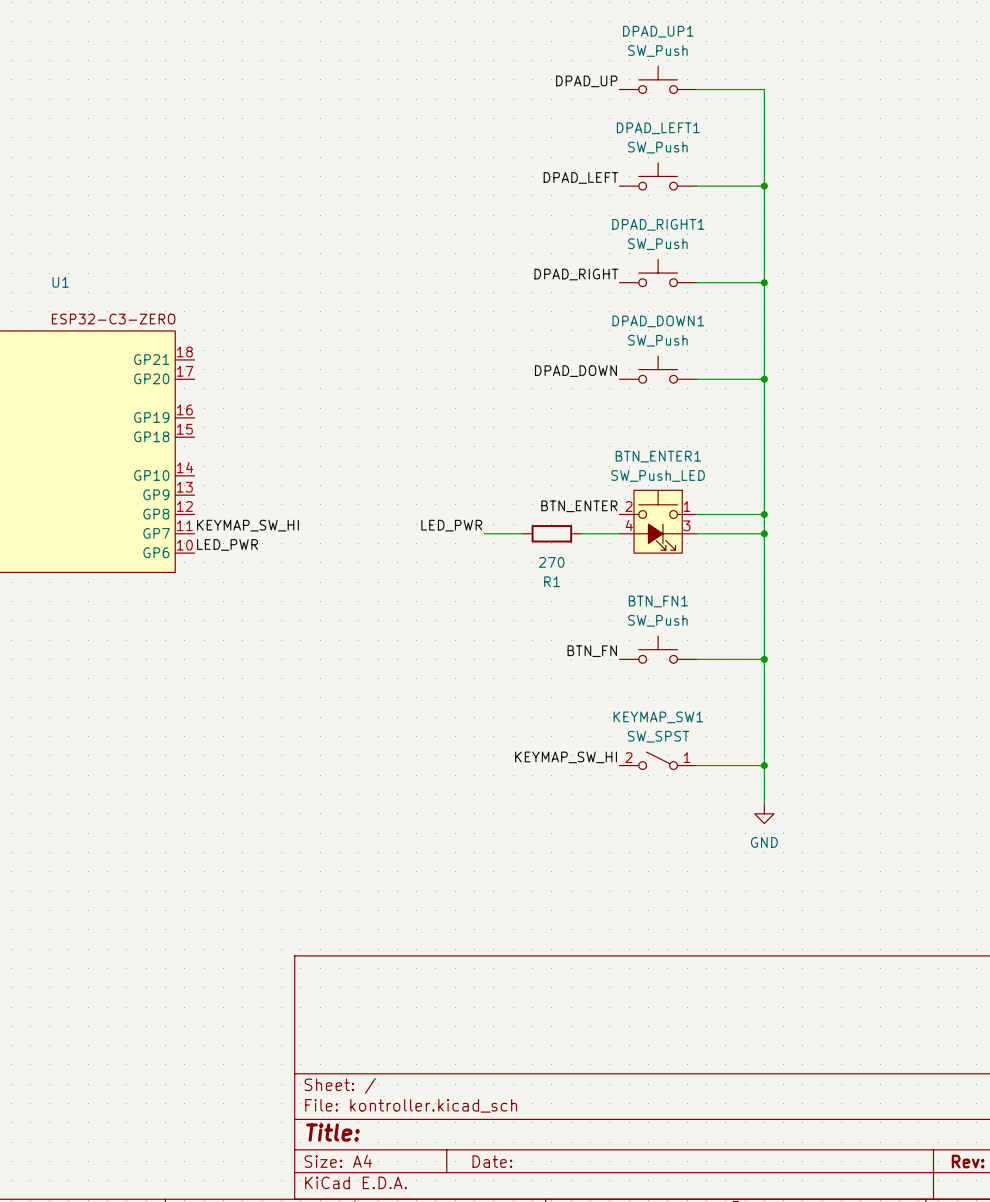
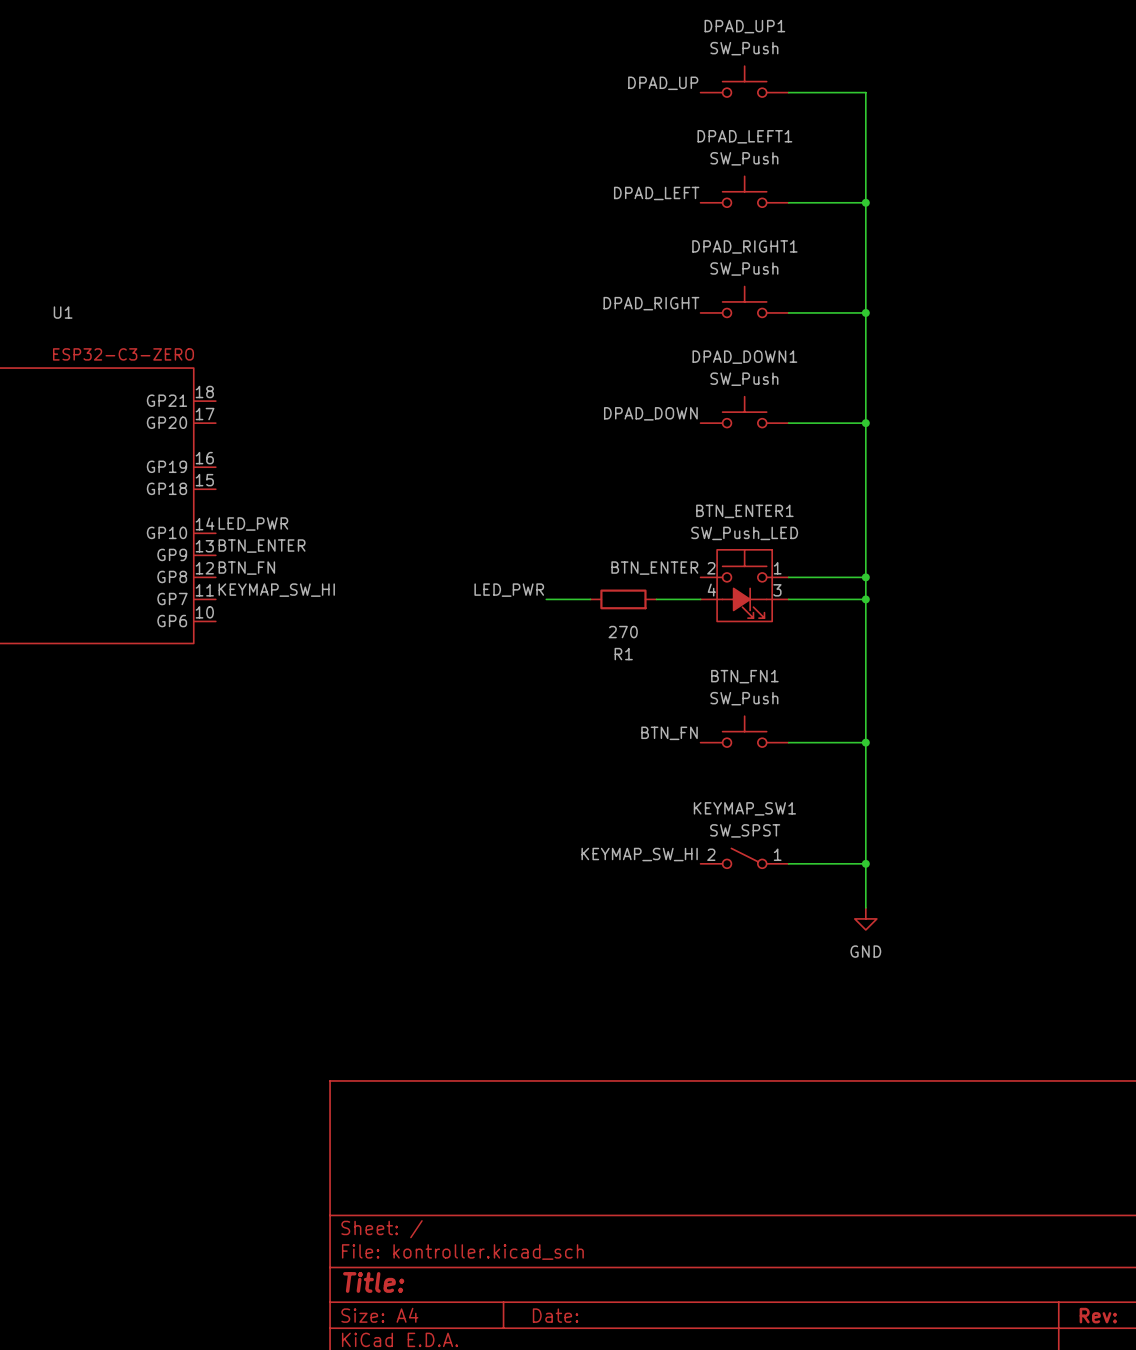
label: none -> BTN_ENTER (262, 546)
label: none -> BTN_FN (246, 568)
label position: LED_PWR (227, 544) -> LED_PWR (253, 524)

